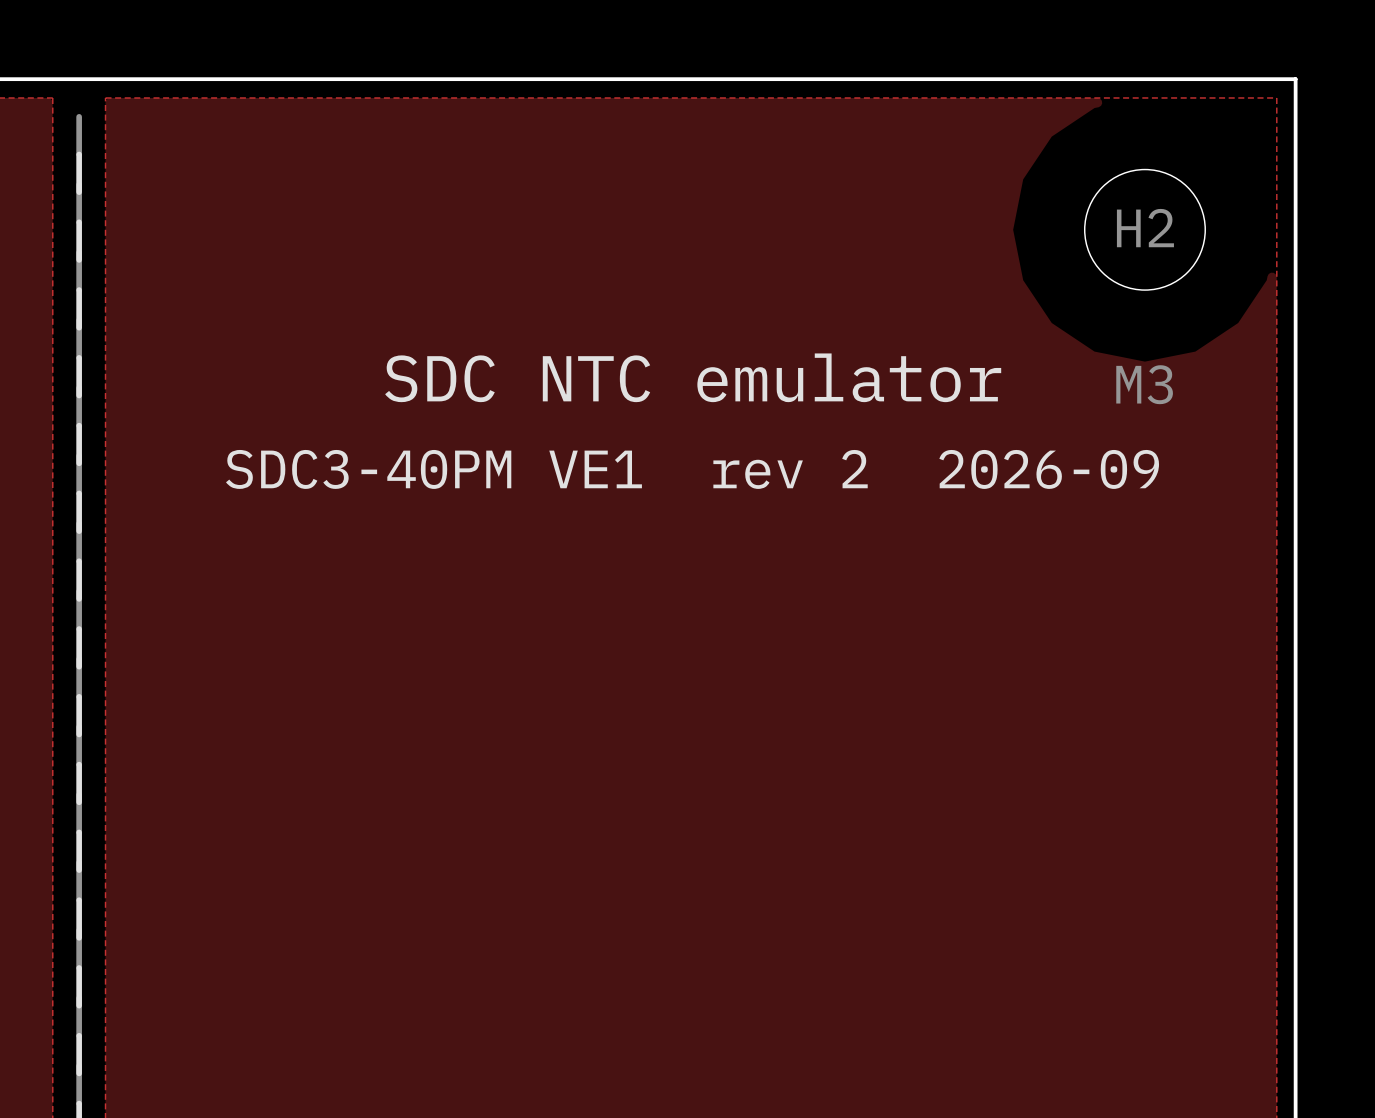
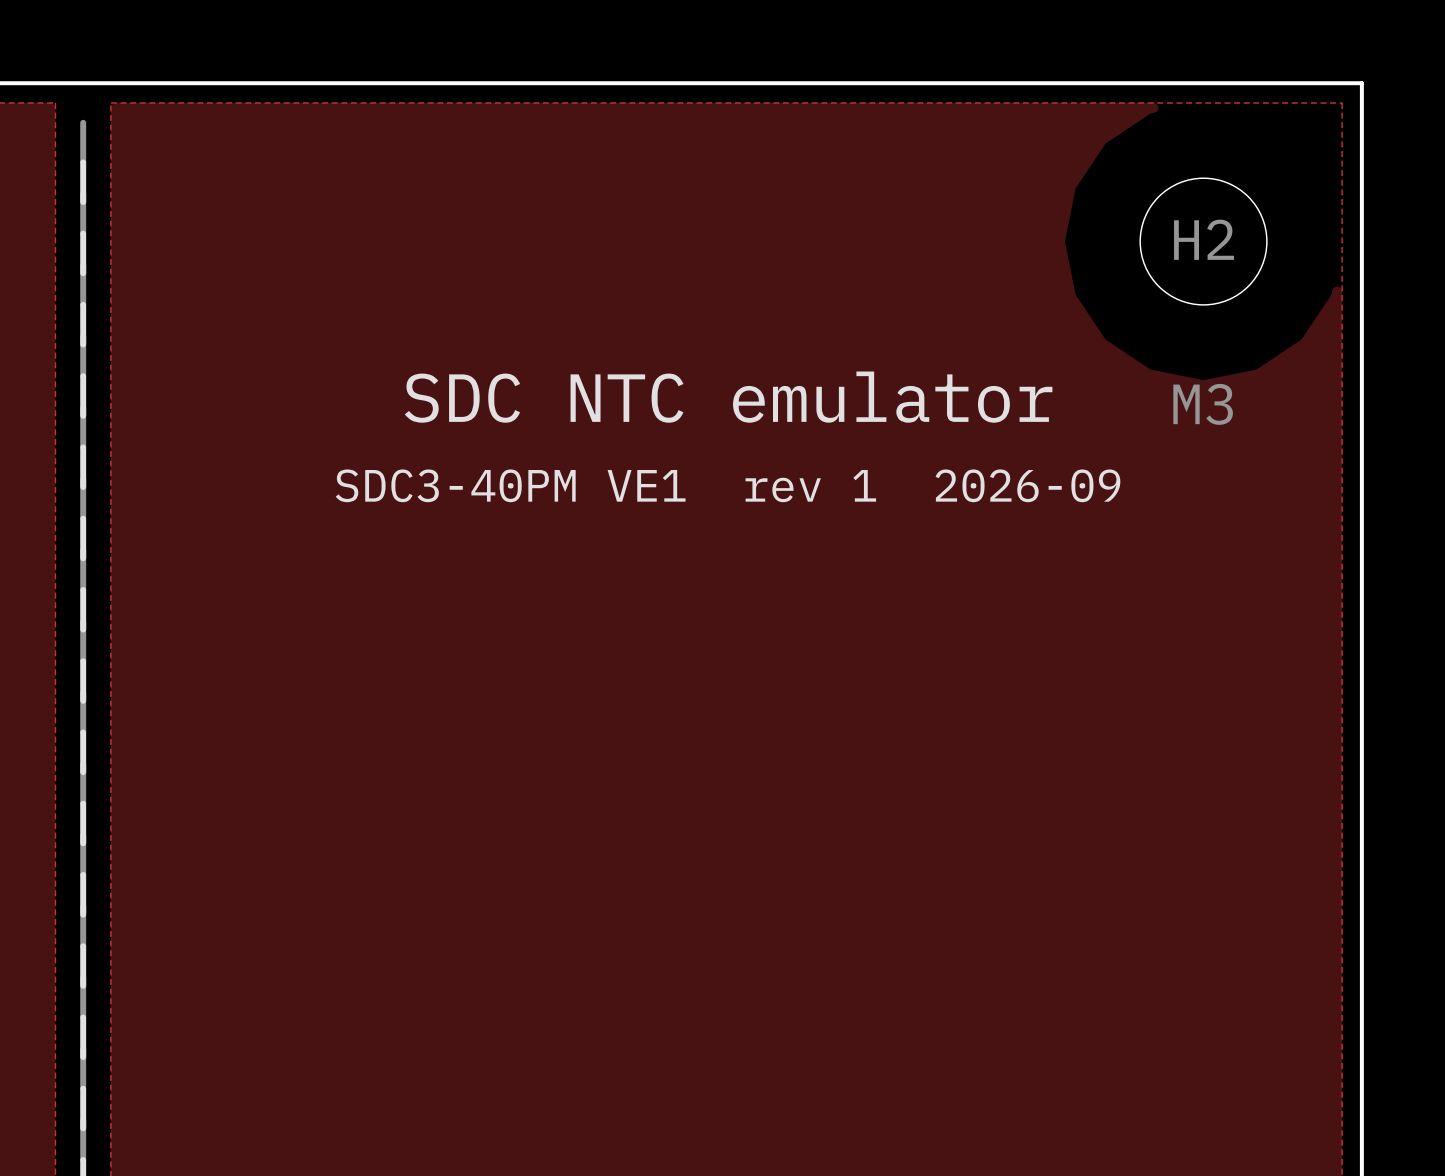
text: SDC3-40PM VE1 rev 2 2026-09 (692, 469) -> SDC3-40PM VE1 rev 1 2026-09 (728, 485)

